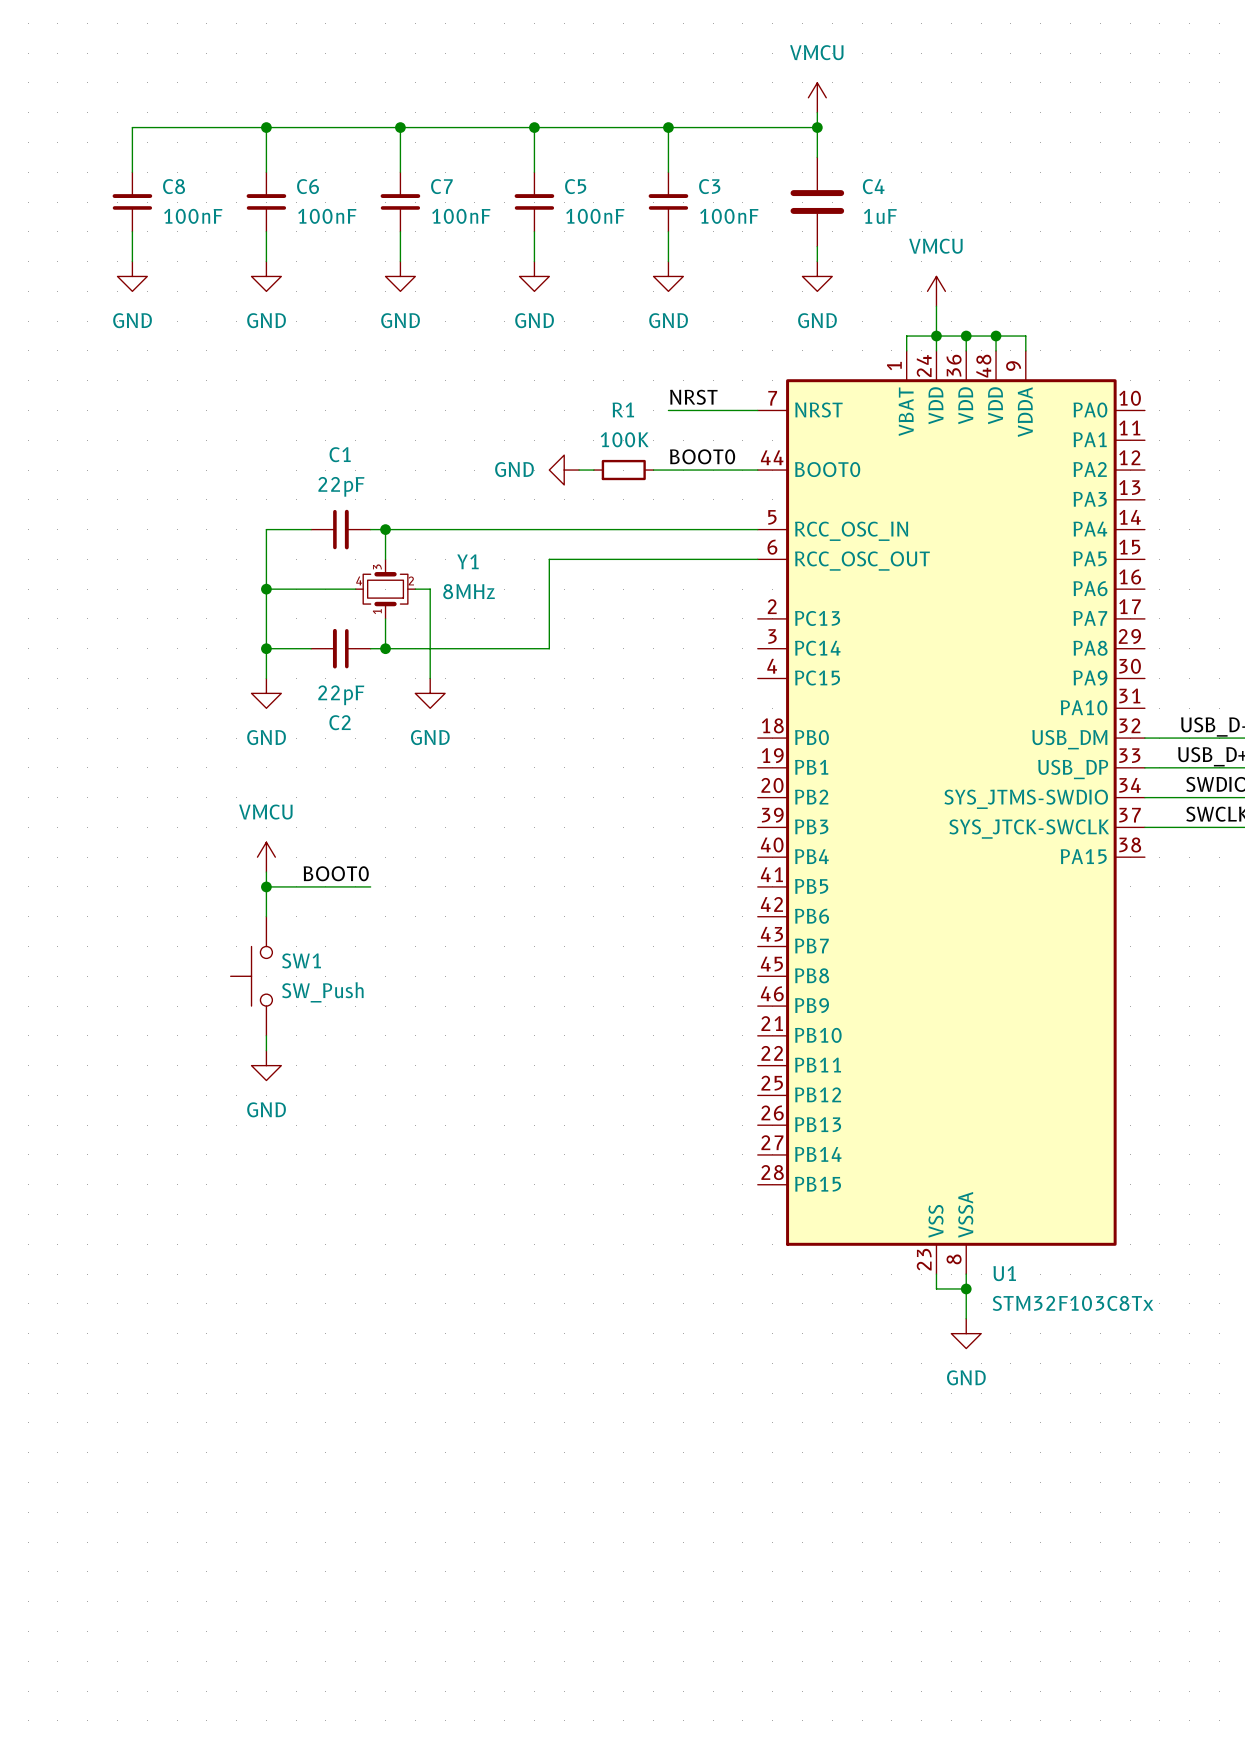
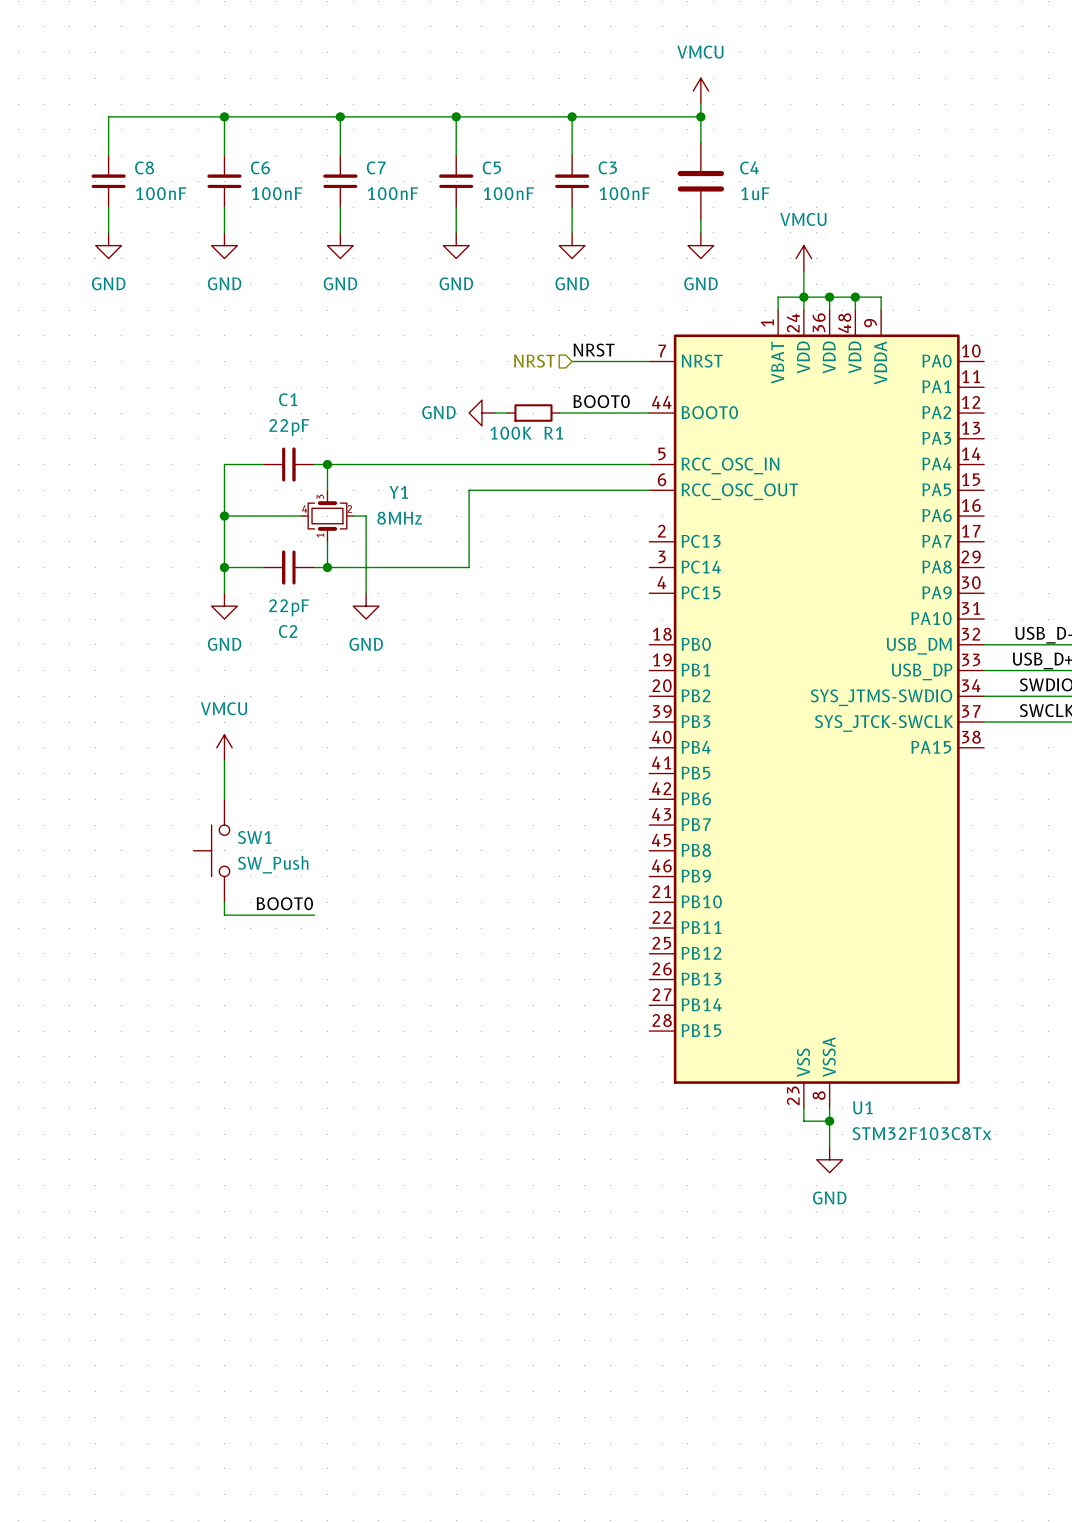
R1 name position: R1 (623, 409) -> R1 (553, 433)
hierarchical label: none -> NRST (534, 361)
R1 value position: 100K (624, 439) -> 100K (511, 433)
label position: BOOT0 (336, 873) -> BOOT0 (284, 903)
wire: (266, 886) (370, 886) -> (224, 915) (314, 915)
junction: (266, 886) -> none
power symbol: GND (266, 1065) -> none

